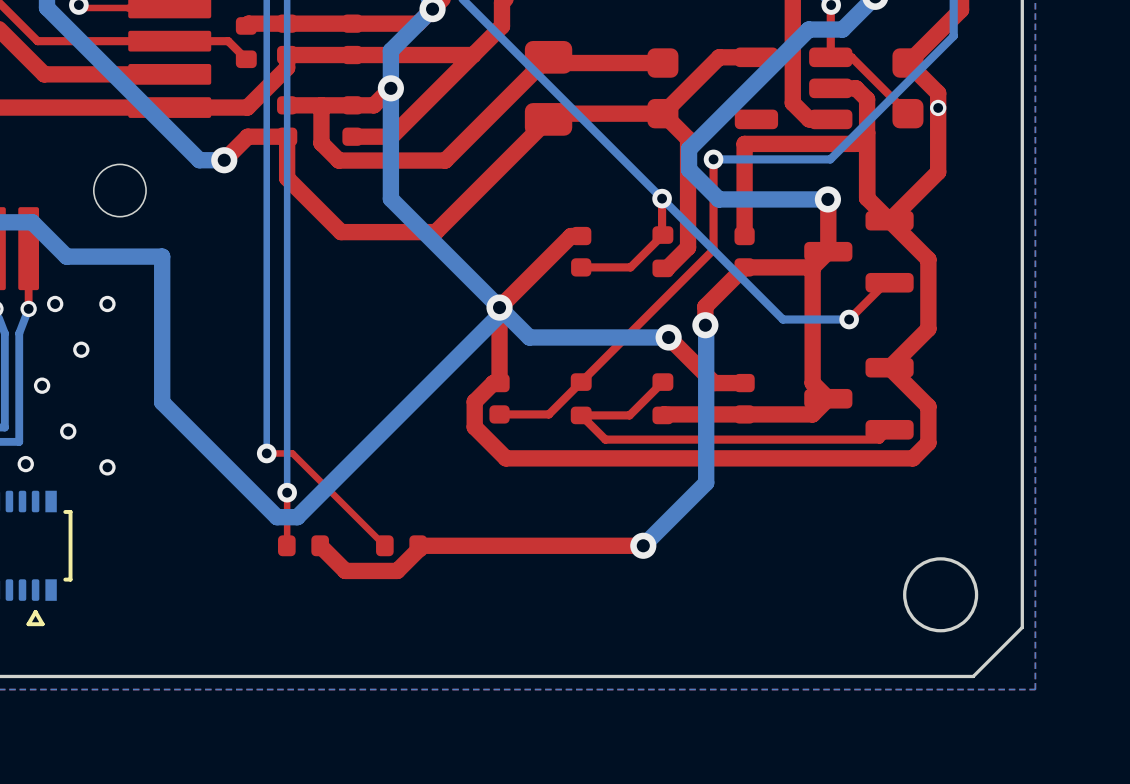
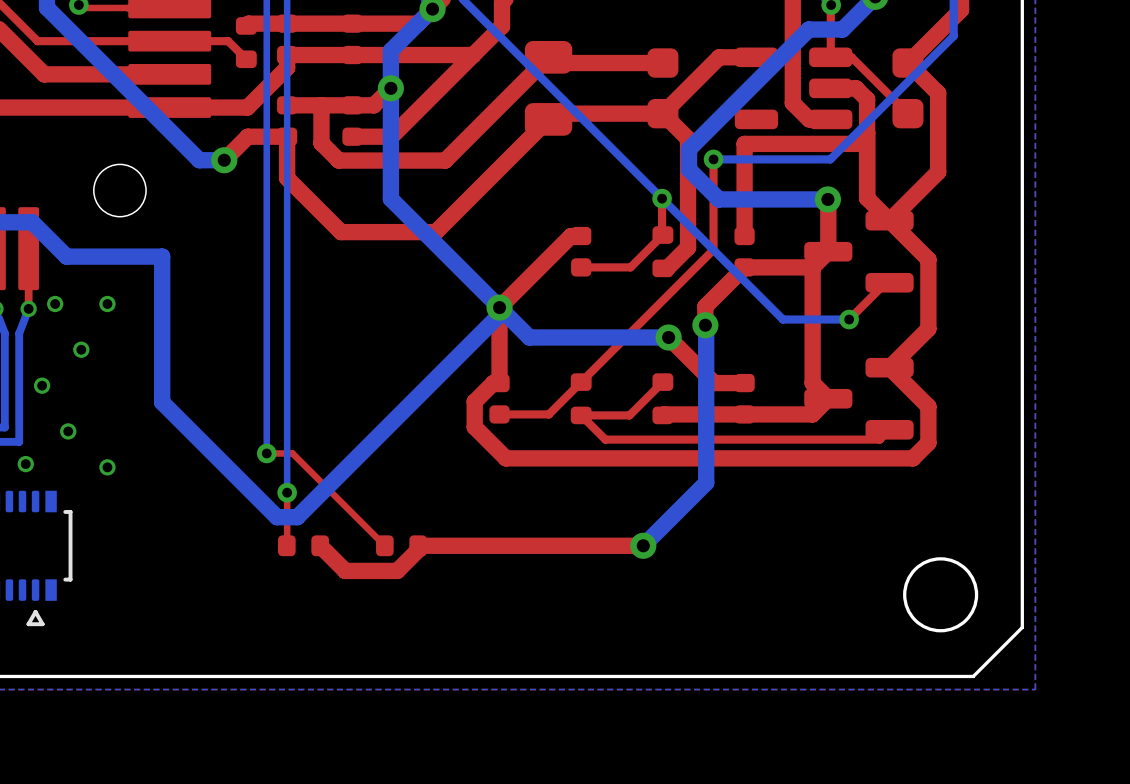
via: (938, 107) -> none

